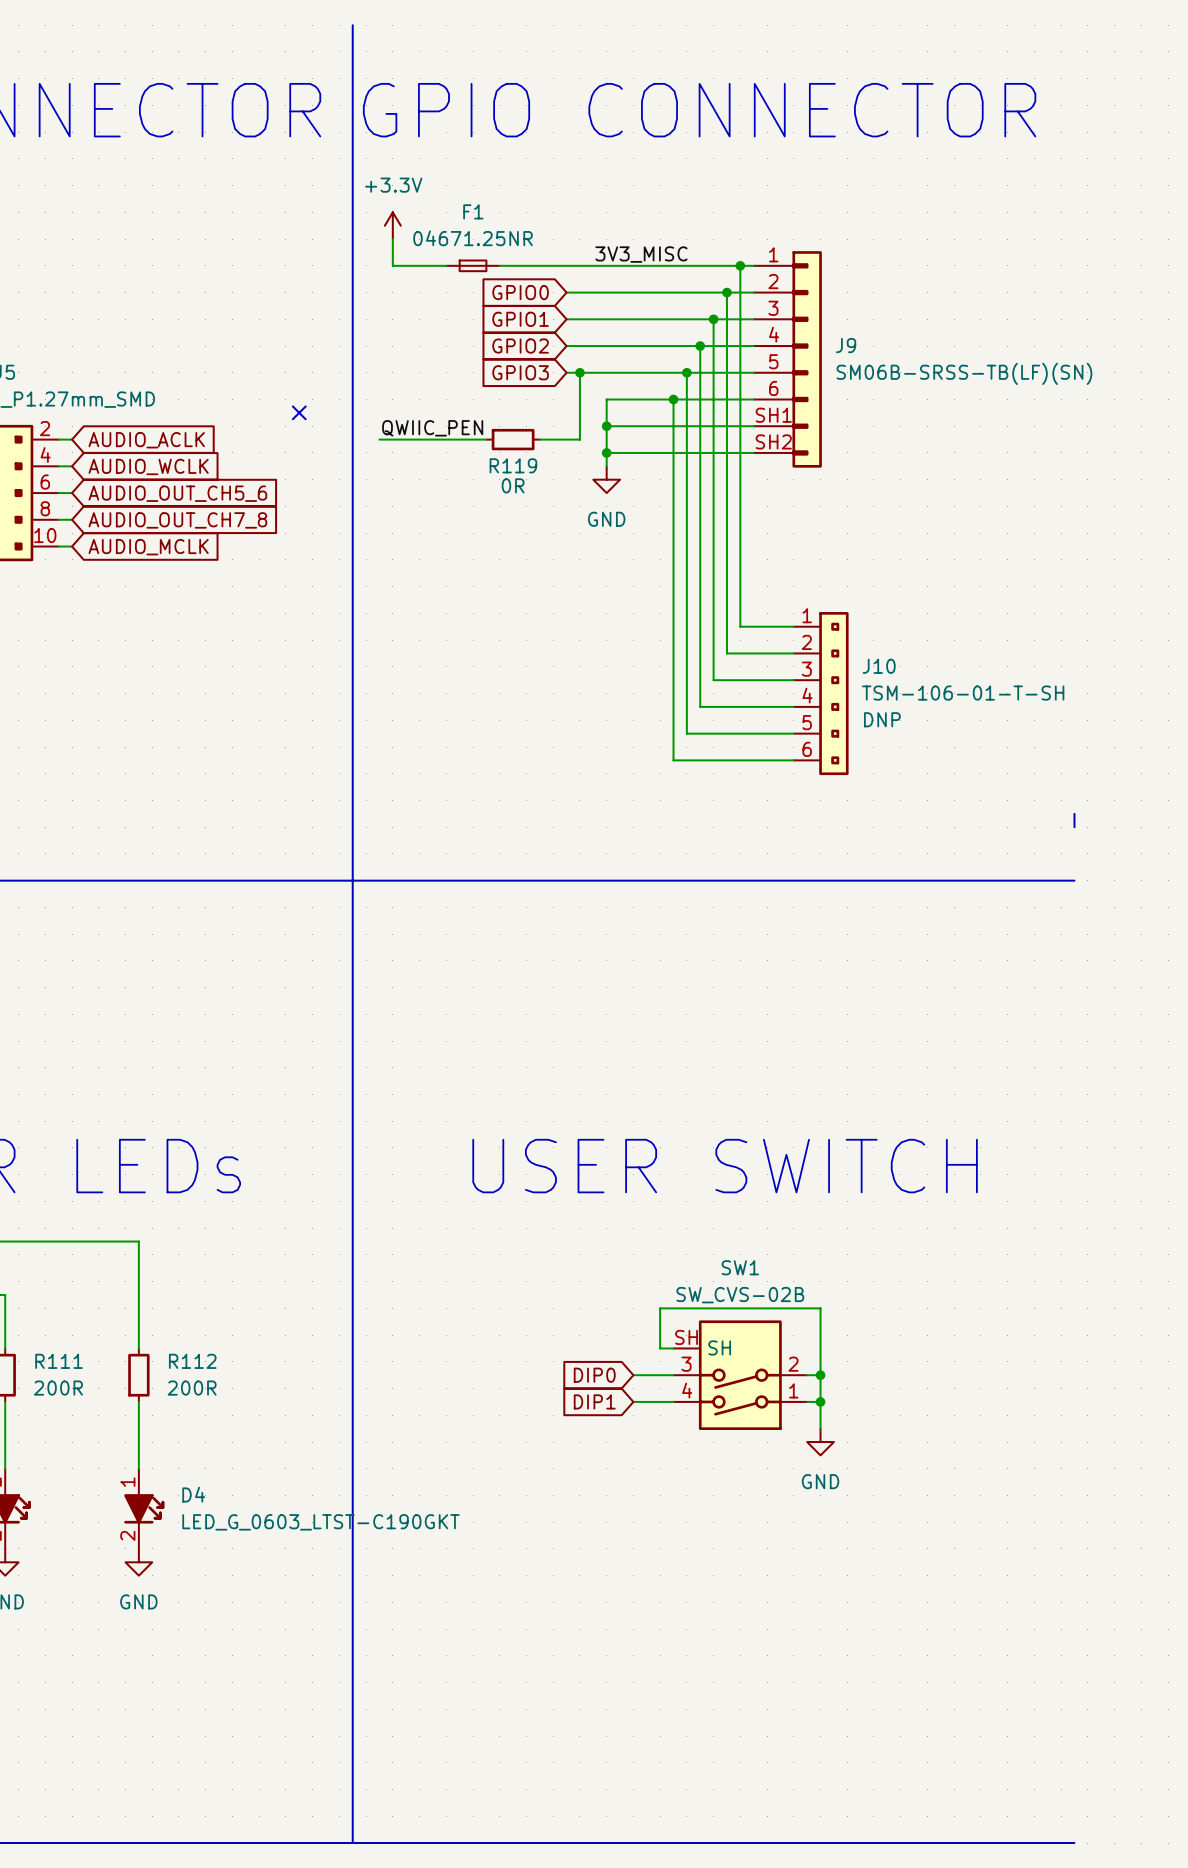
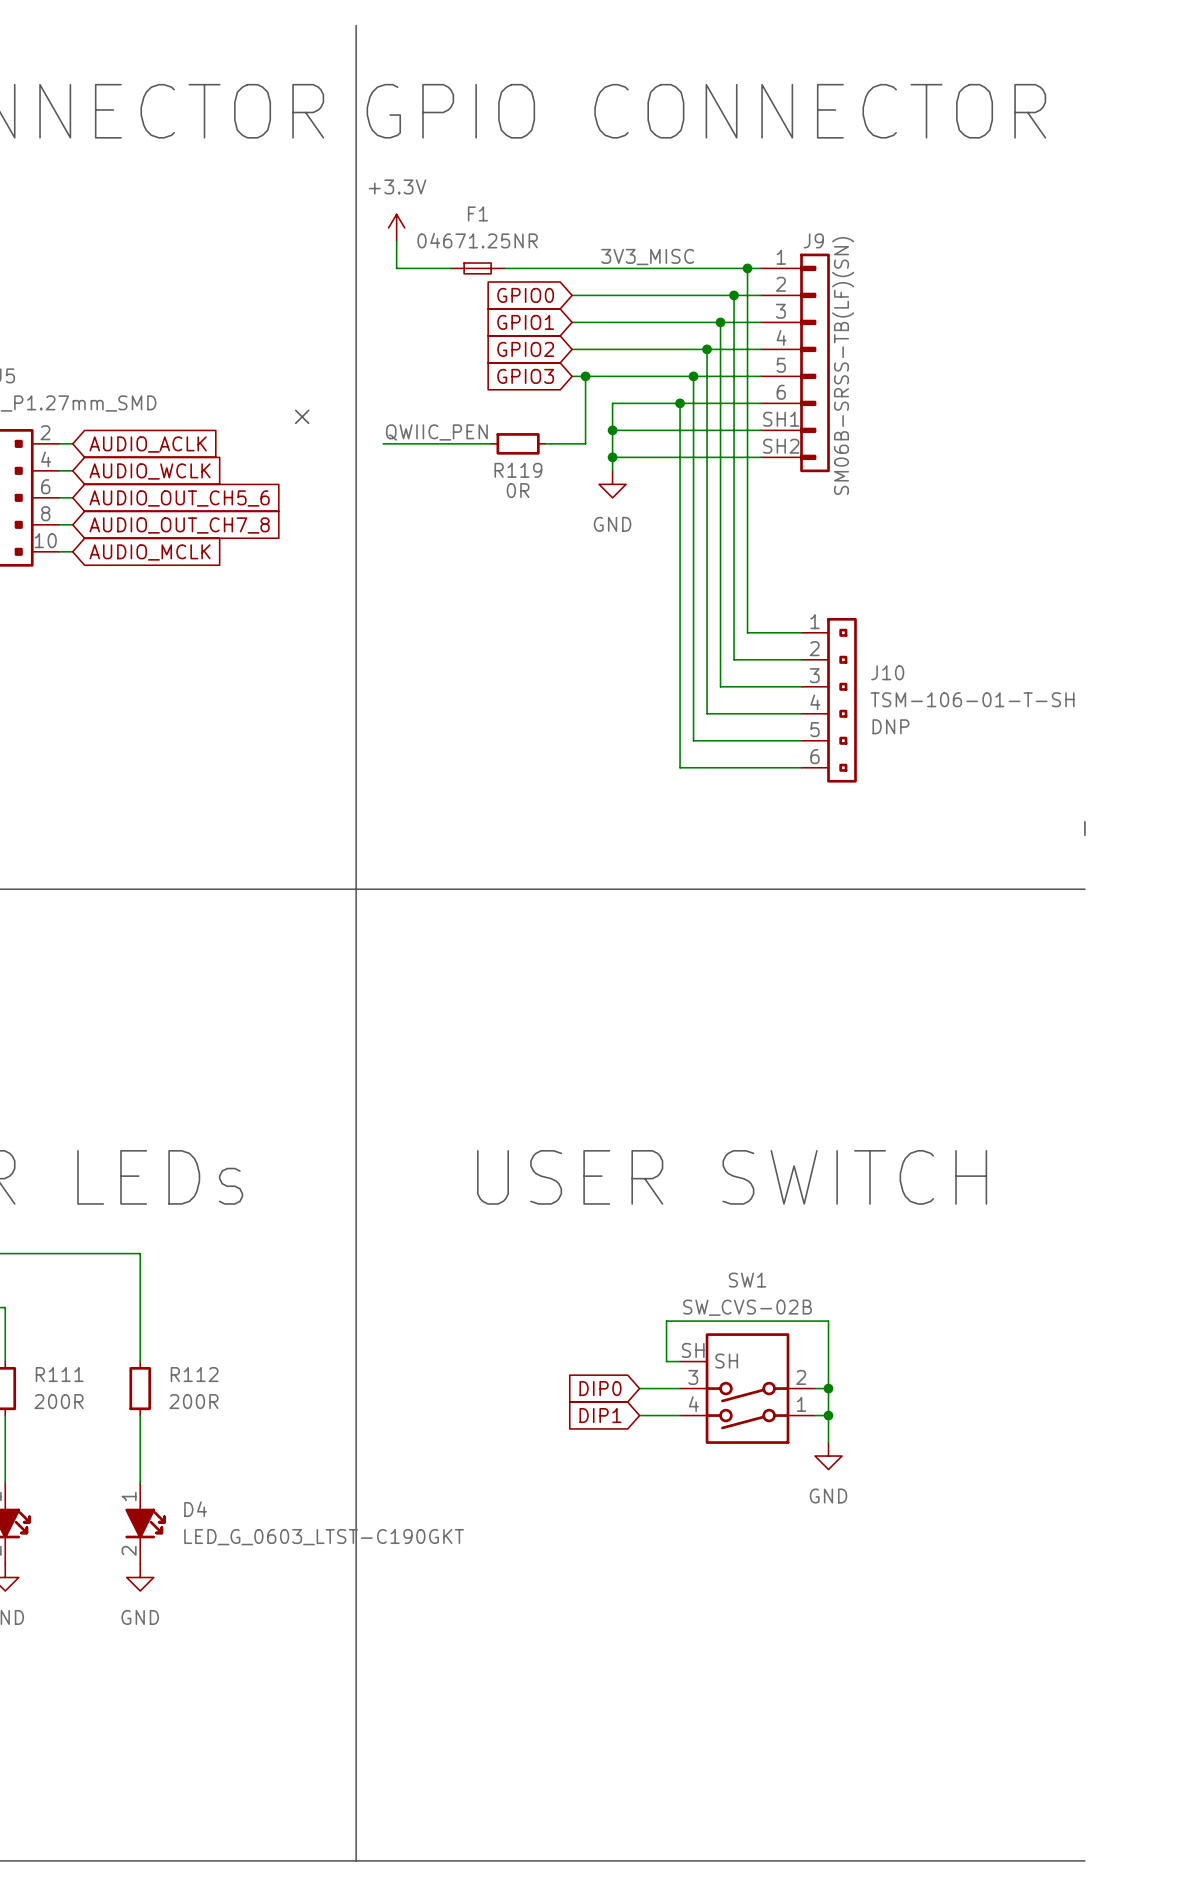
J9 name position: J9 (846, 345) -> J9 (813, 240)
J9 text rotation: 0° (964, 373) -> 90° counterclockwise (843, 366)

